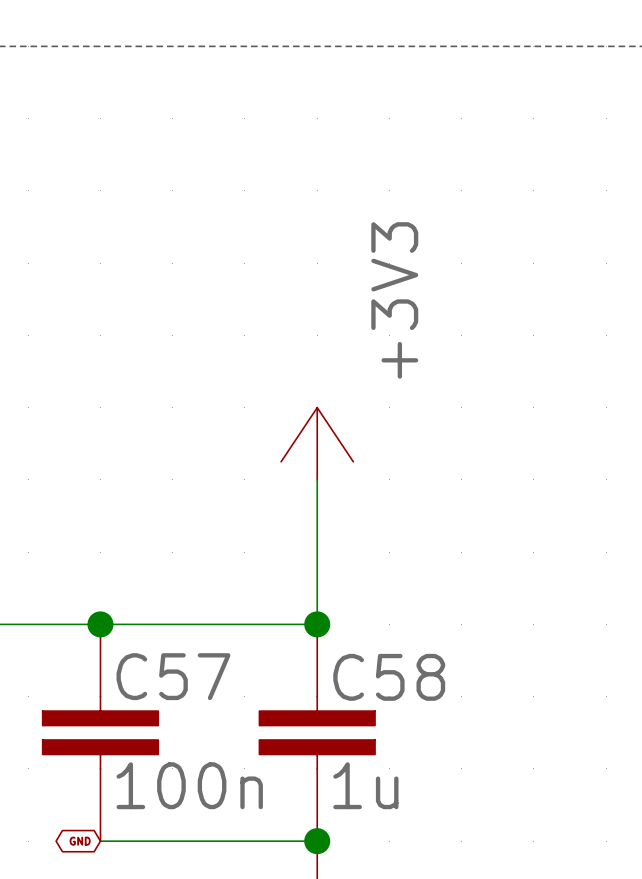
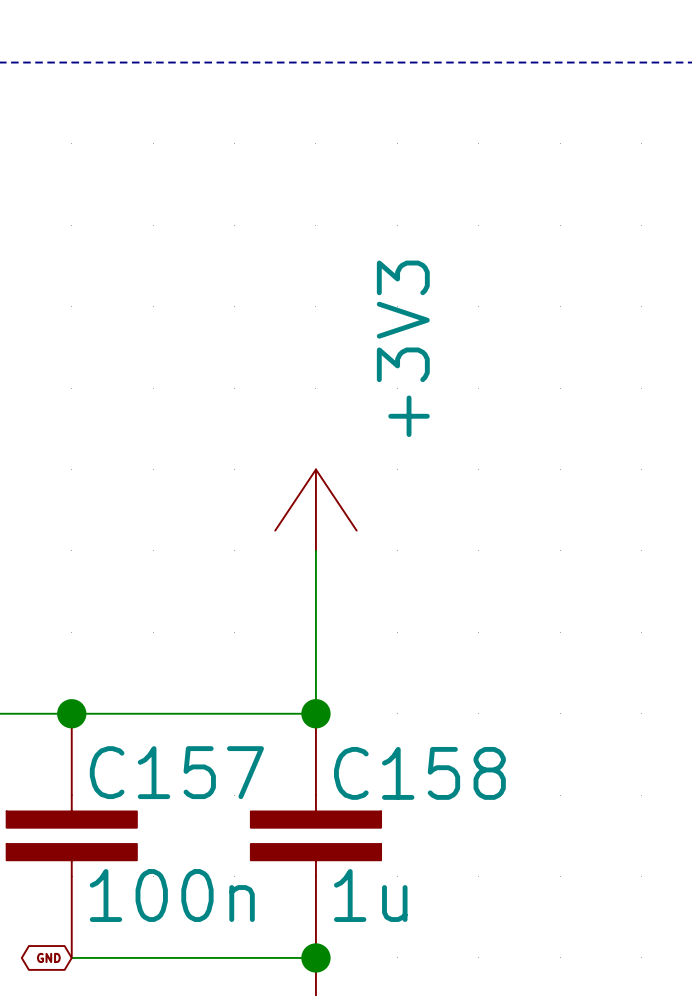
C57 name: C57 (173, 676) -> C157 (176, 772)
C58 name: C58 (389, 677) -> C158 (419, 773)

